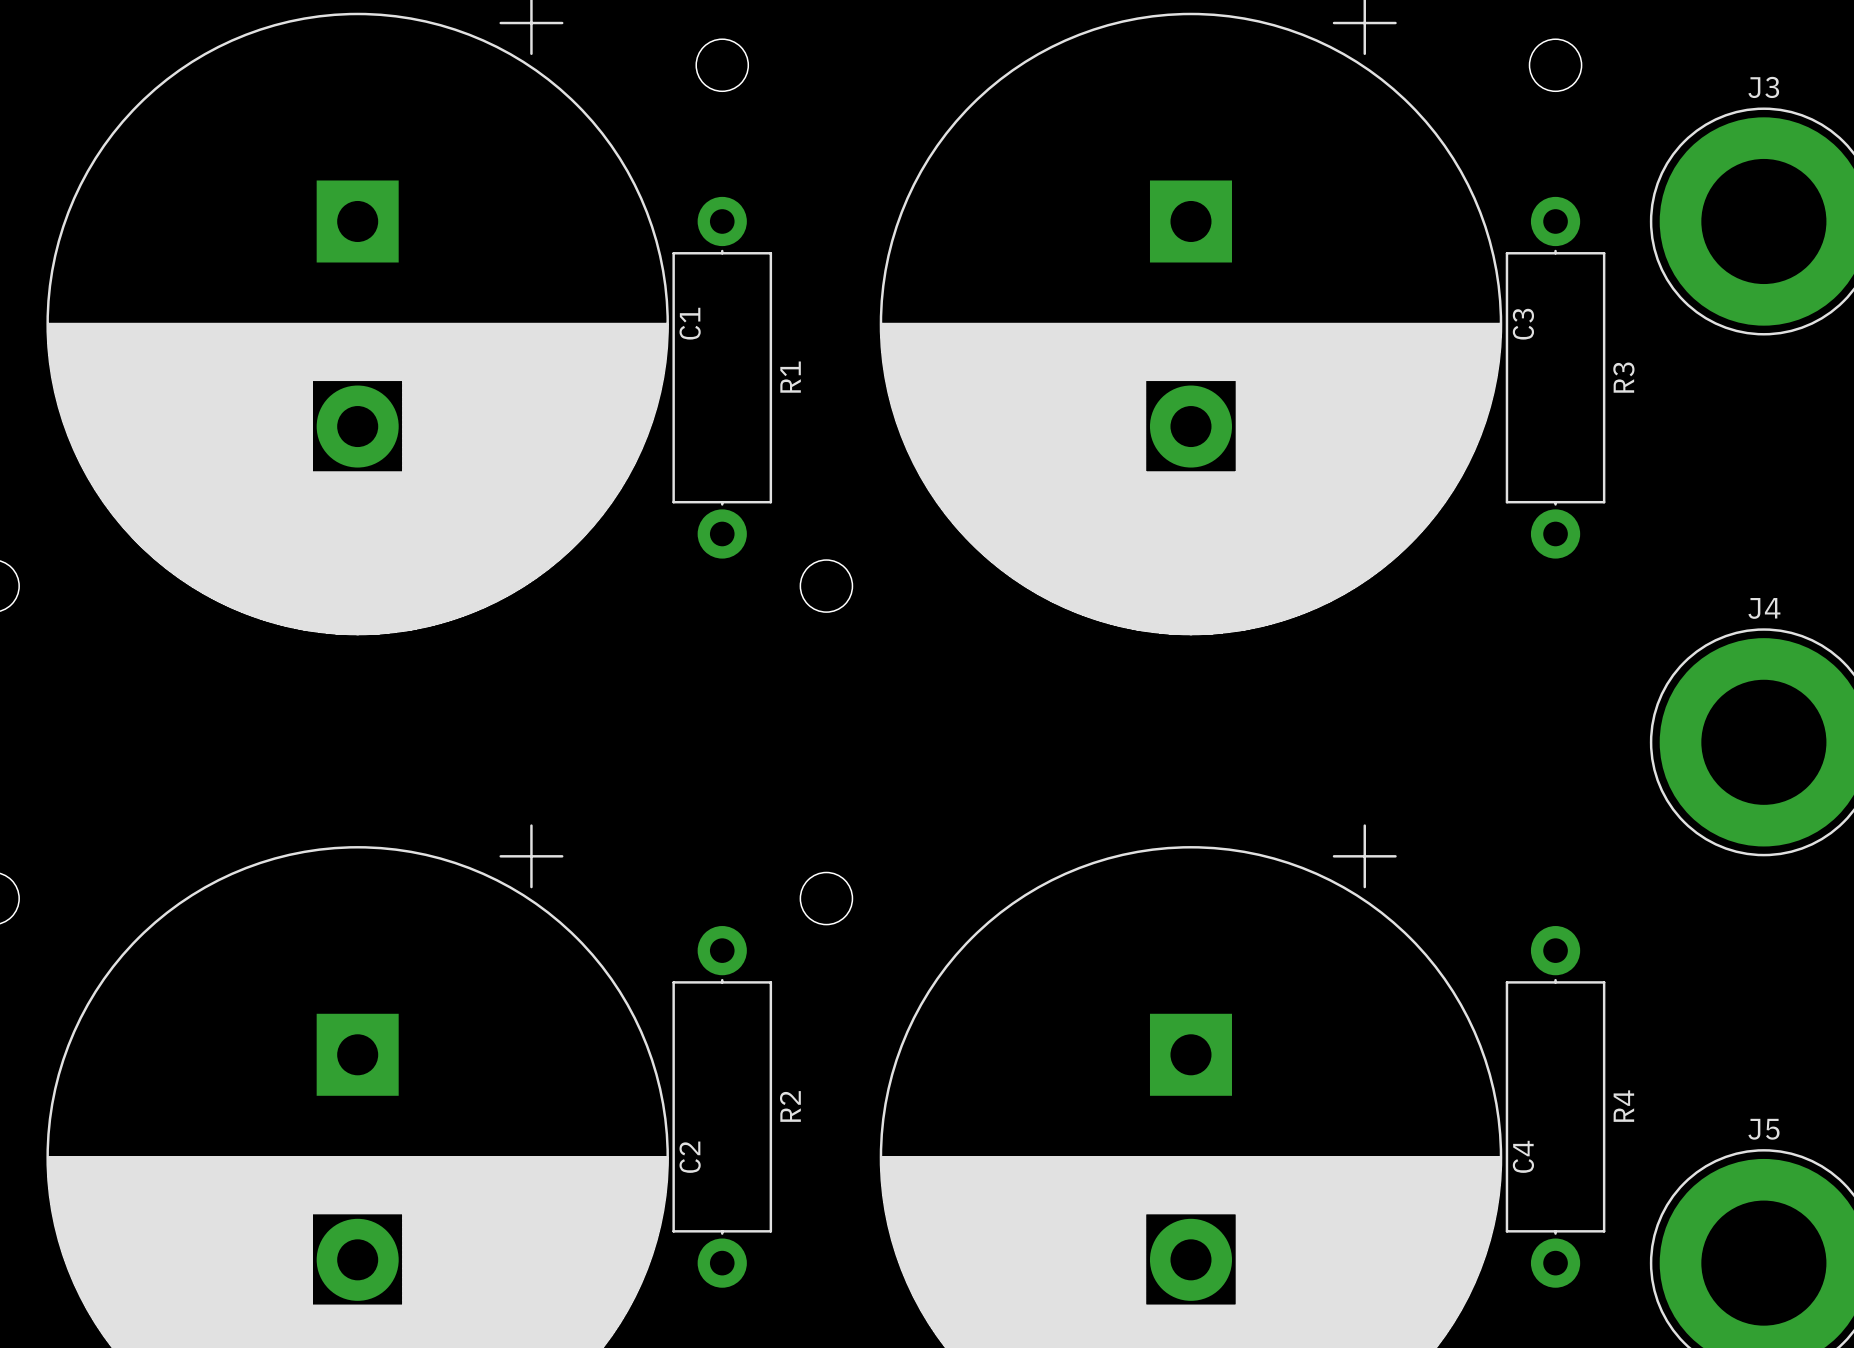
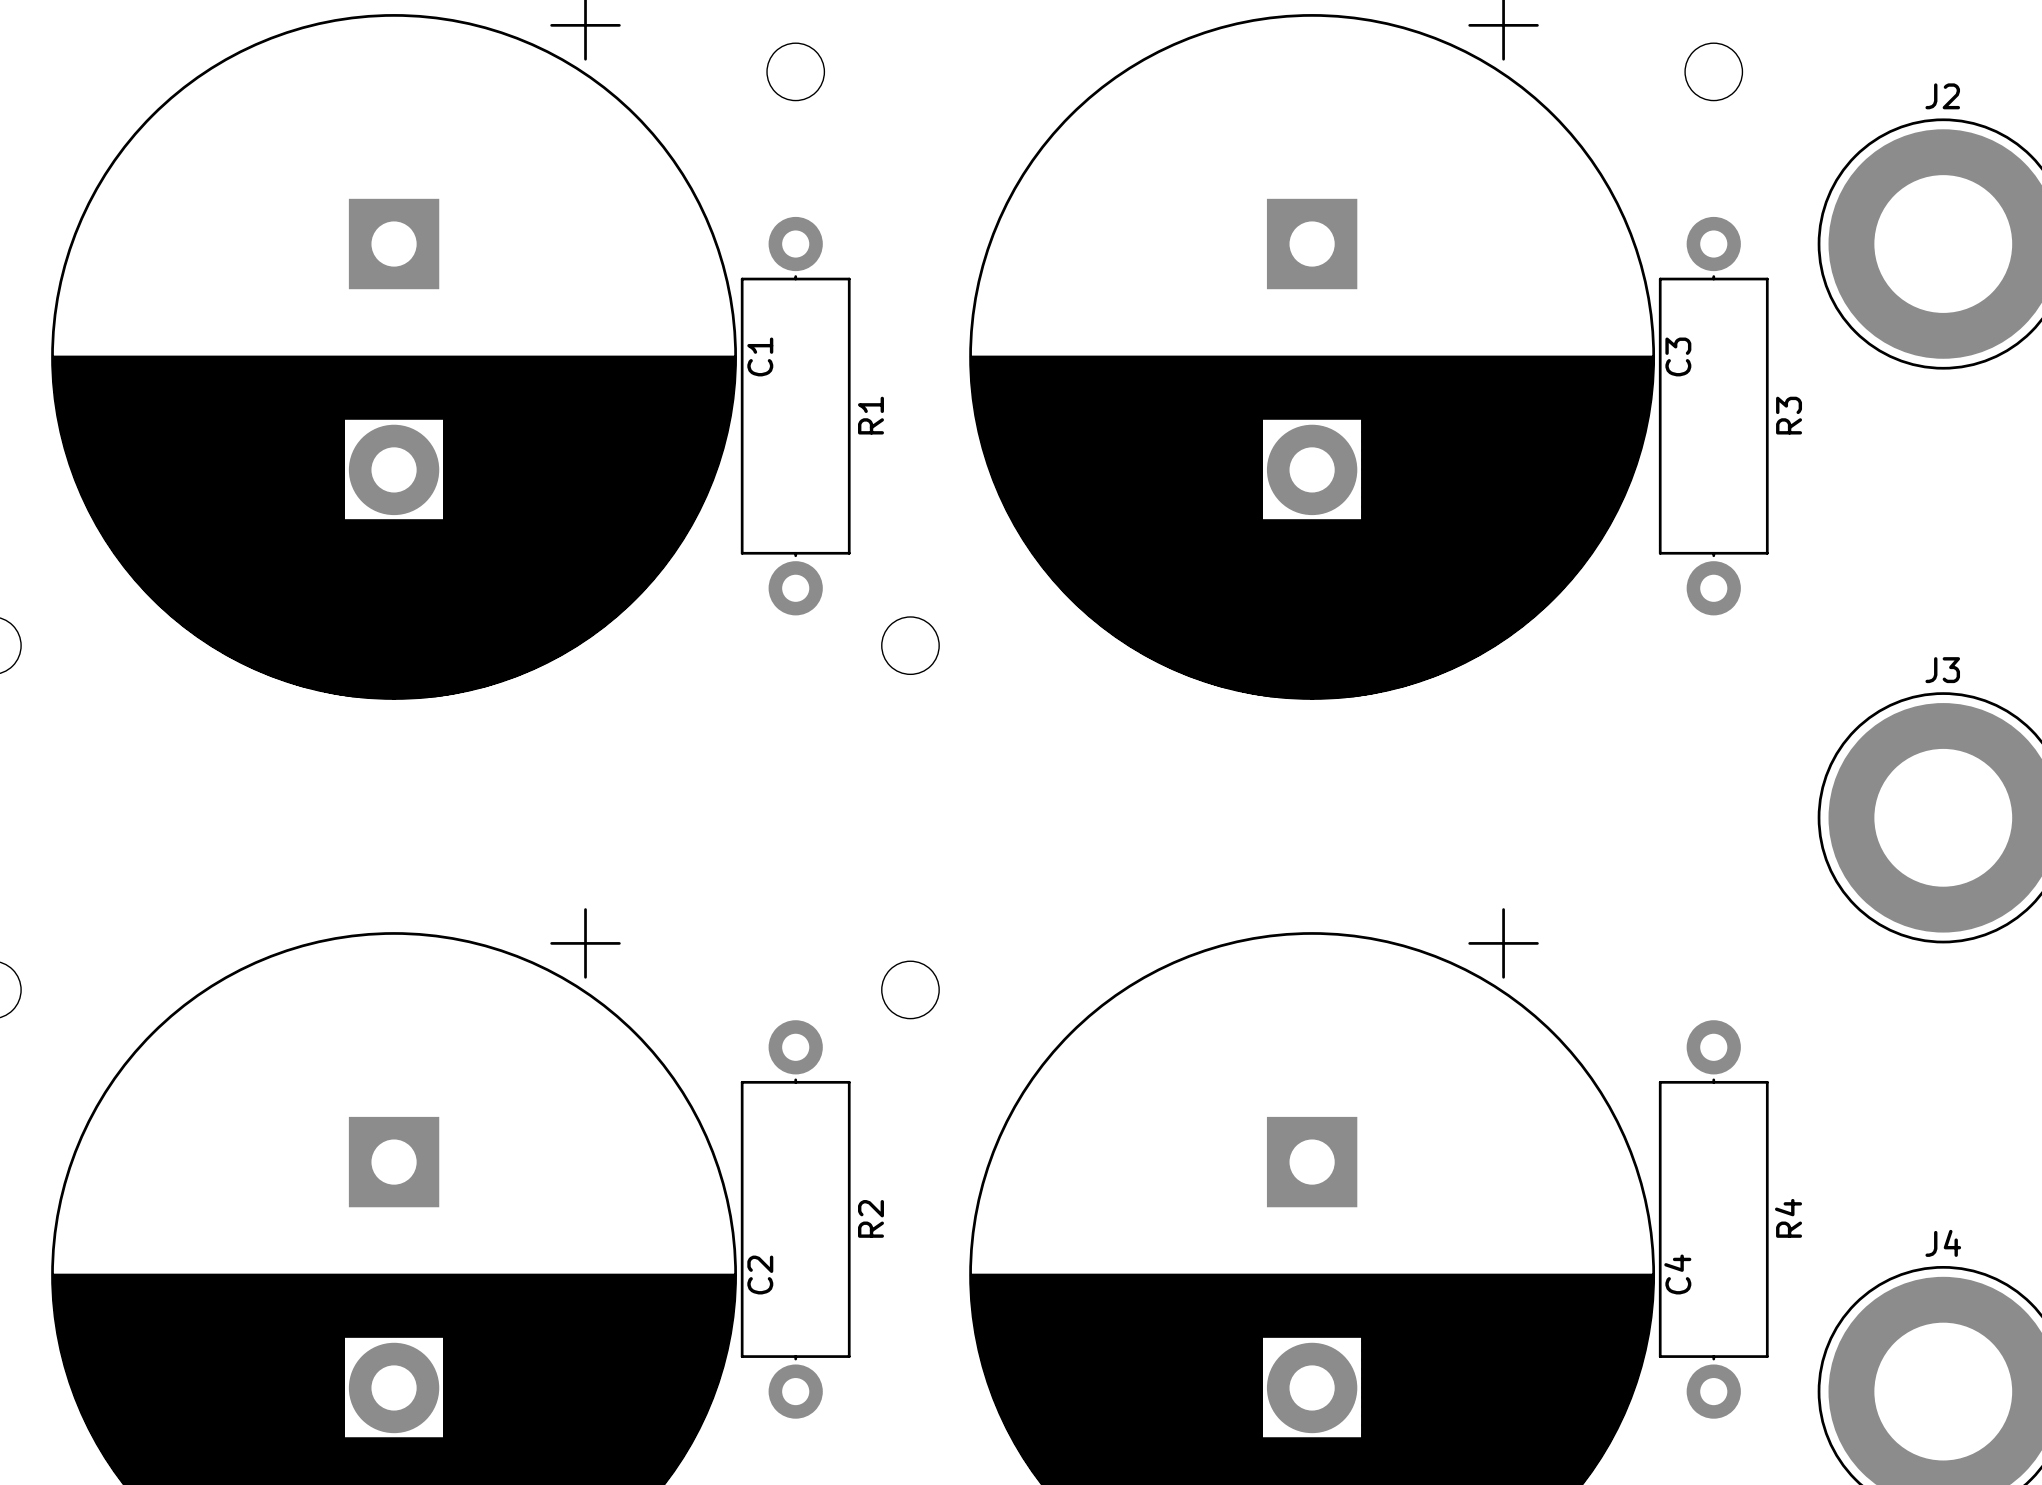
J3 name: J3 (1763, 87) -> J2 (1942, 96)
J4 name: J4 (1764, 608) -> J3 (1942, 670)
J5 name: J5 (1763, 1129) -> J4 (1943, 1243)

